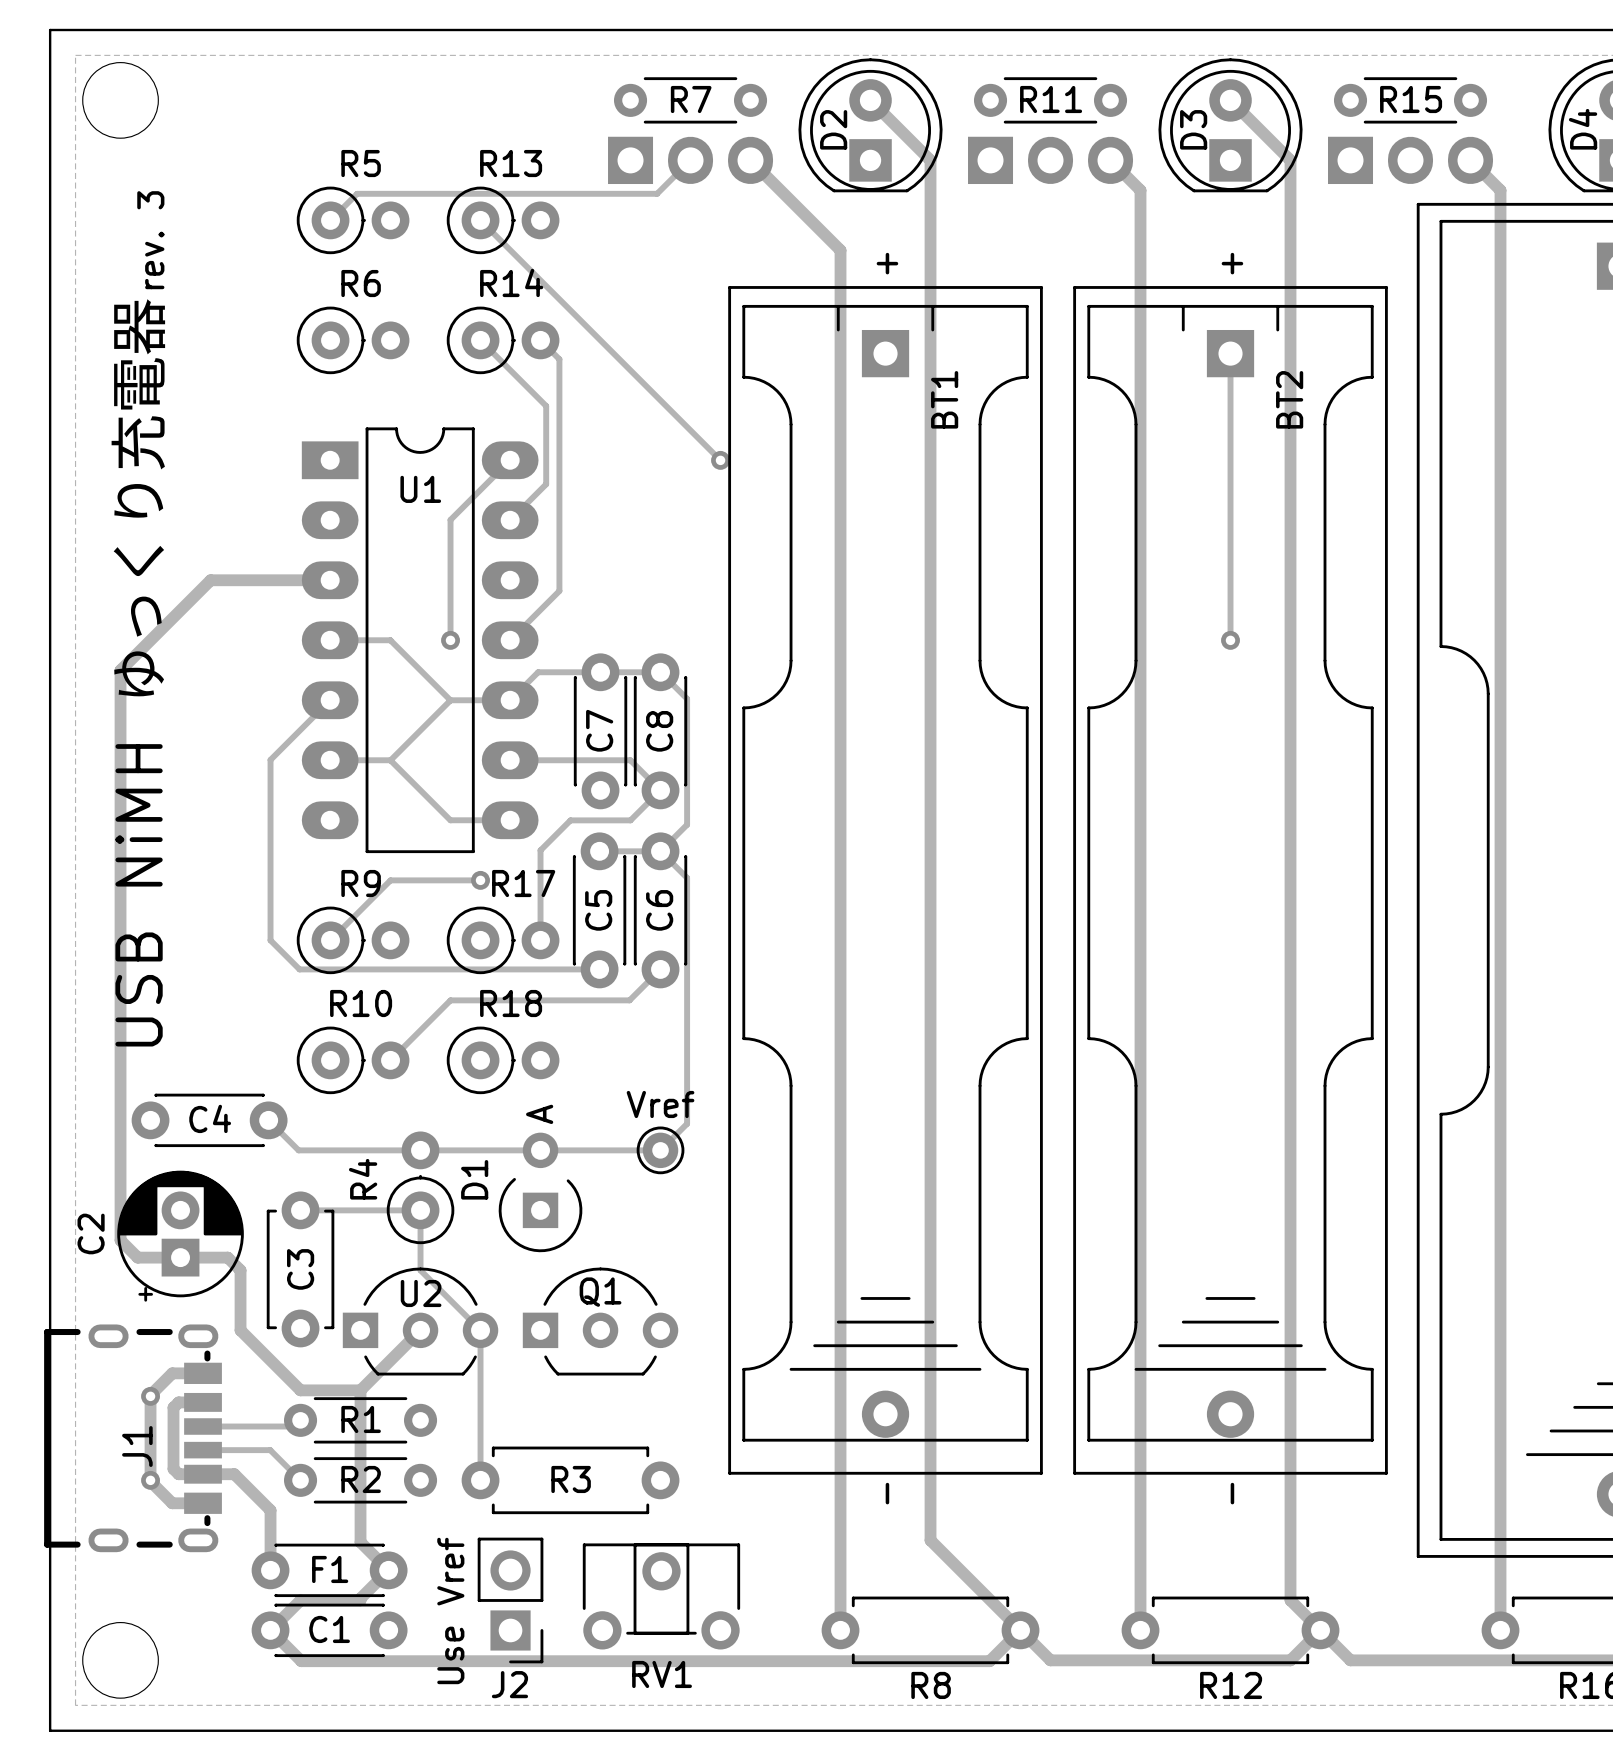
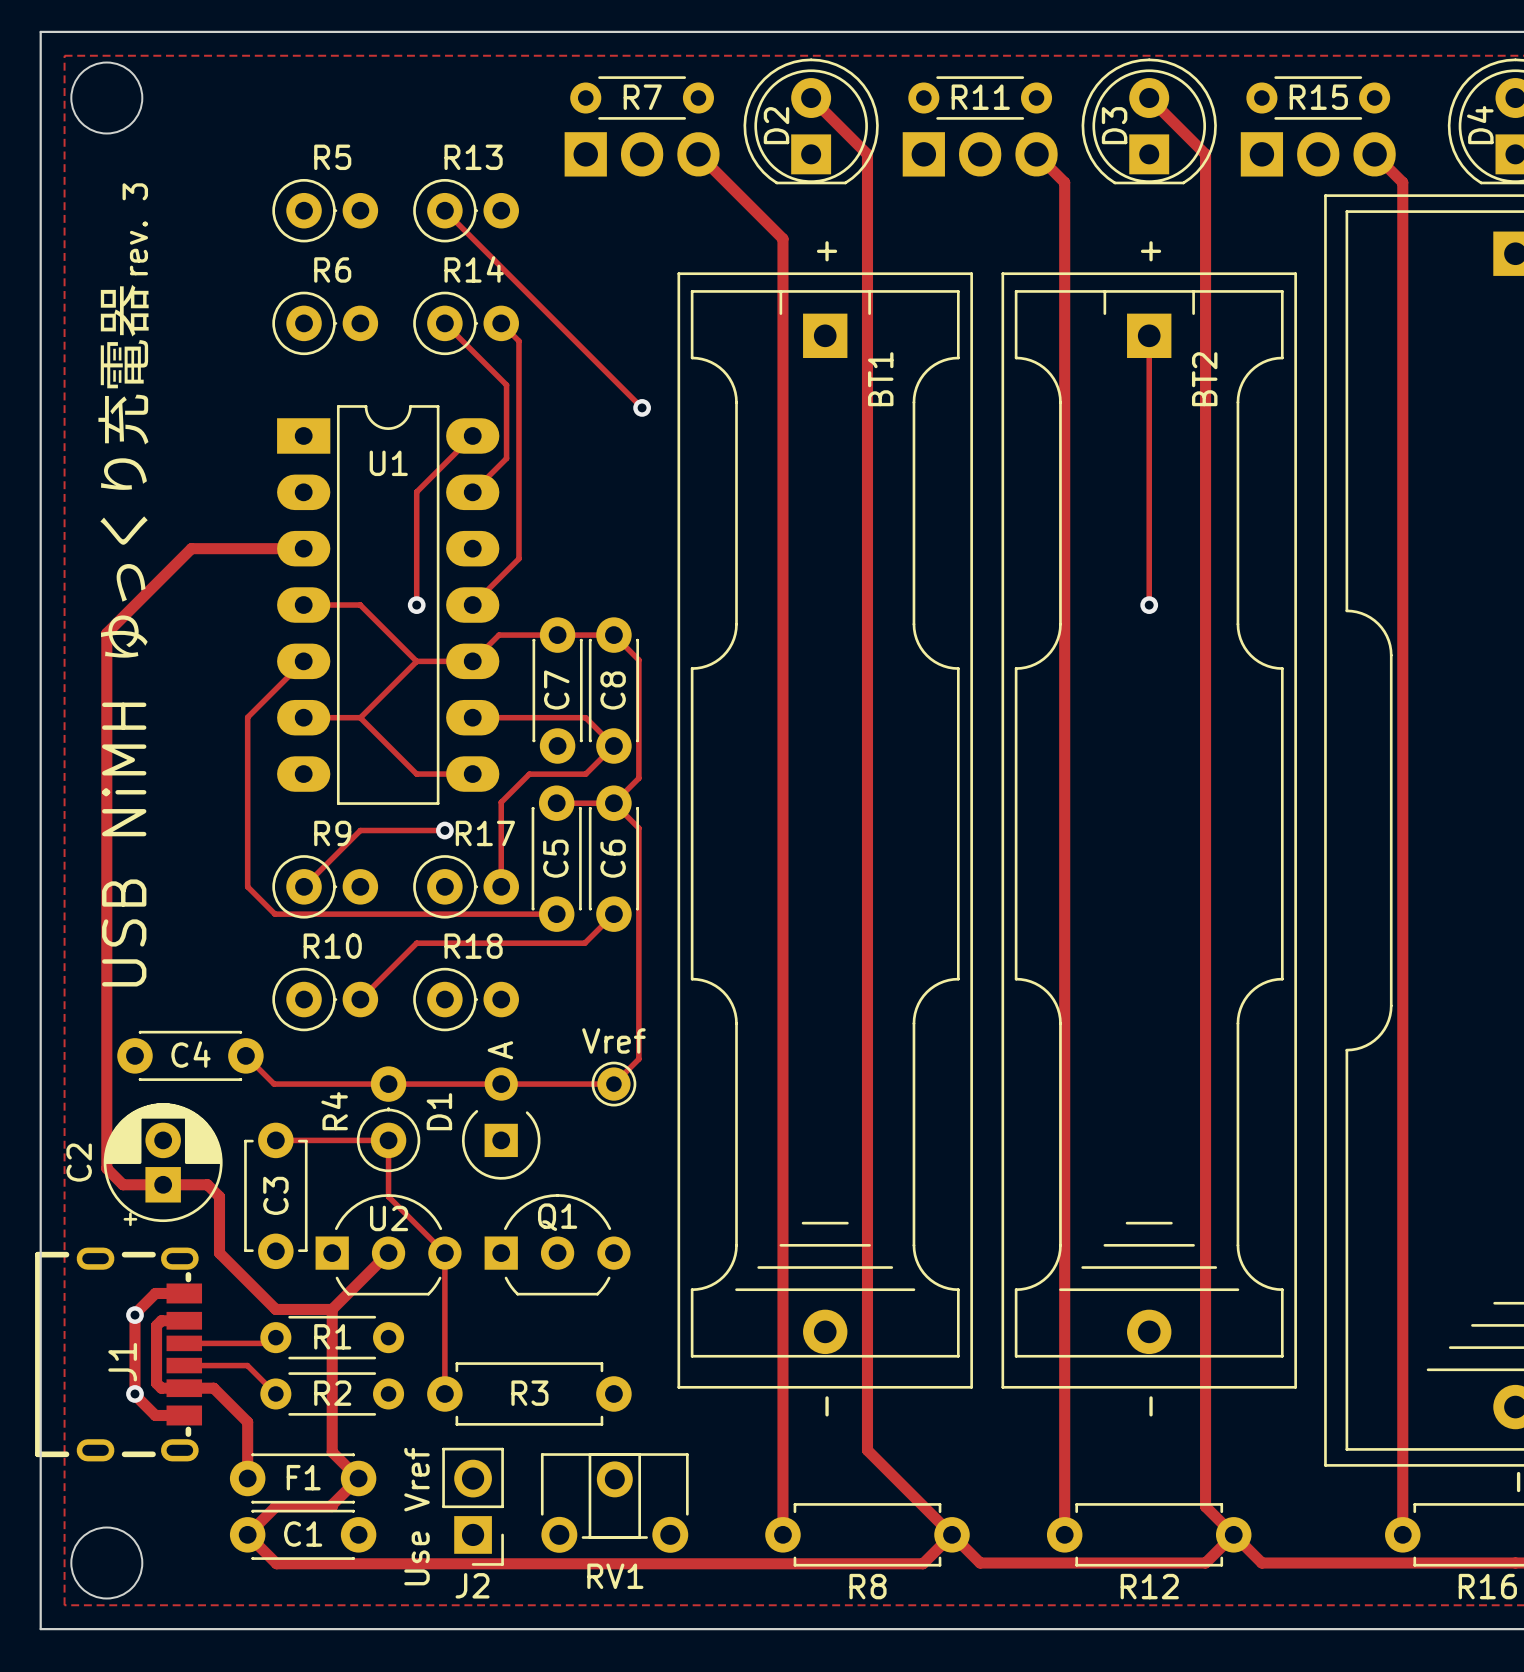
track: (690, 160) (657, 193) (357, 193) (330, 220) -> none
track: (690, 430) (720, 460) -> none
via position: (720, 460) -> (642, 407)

